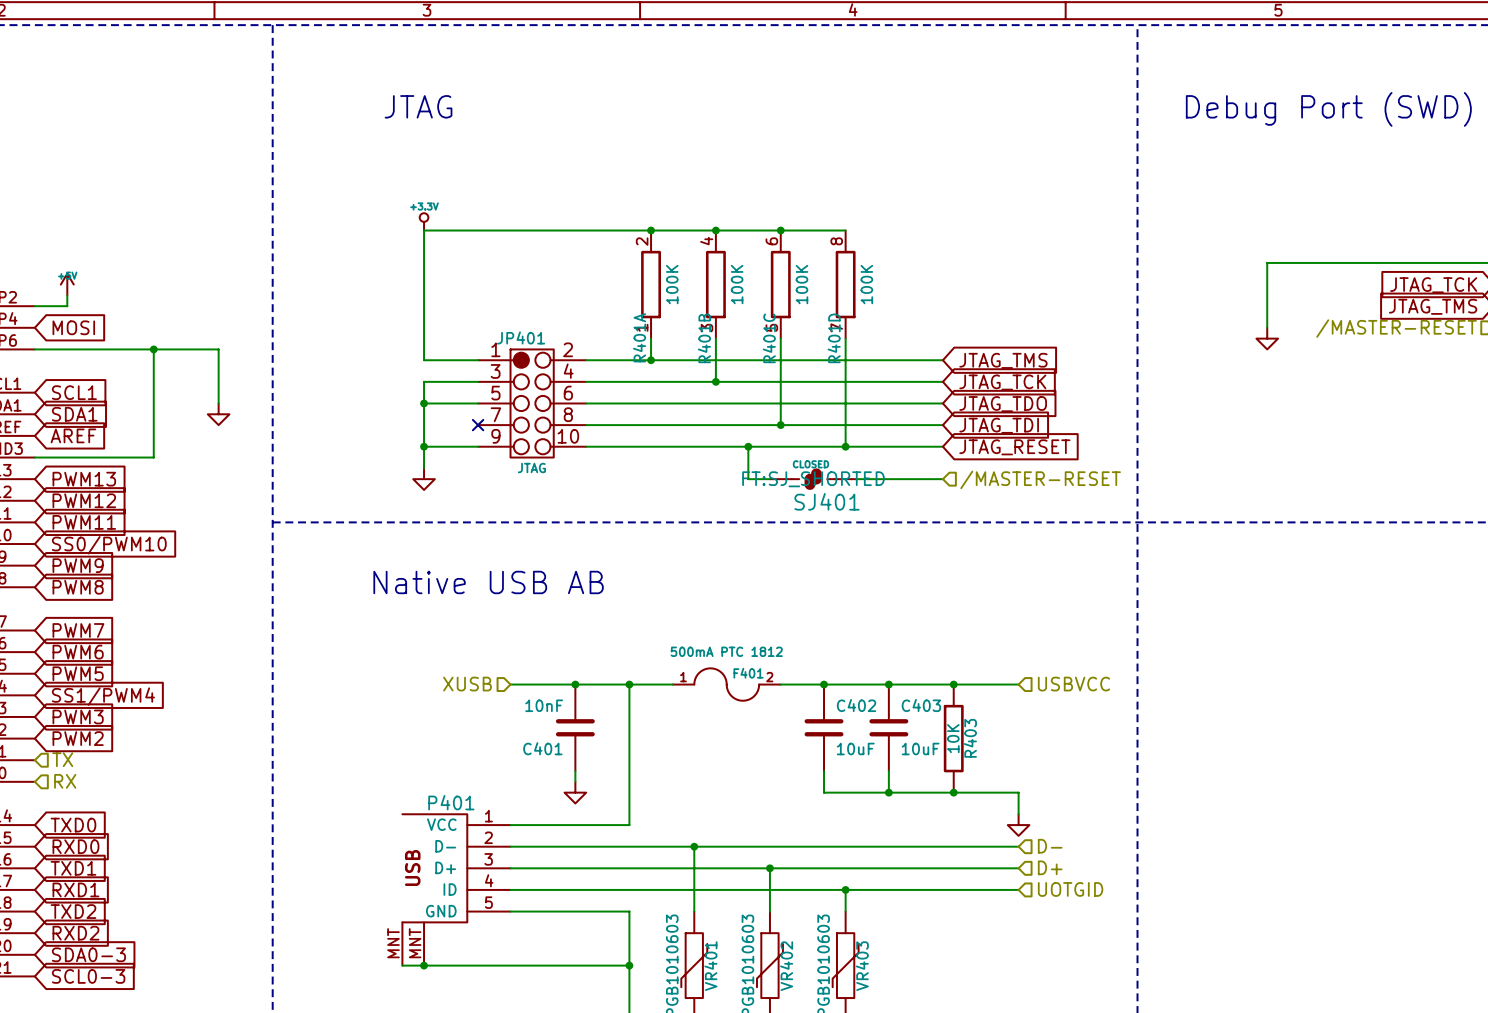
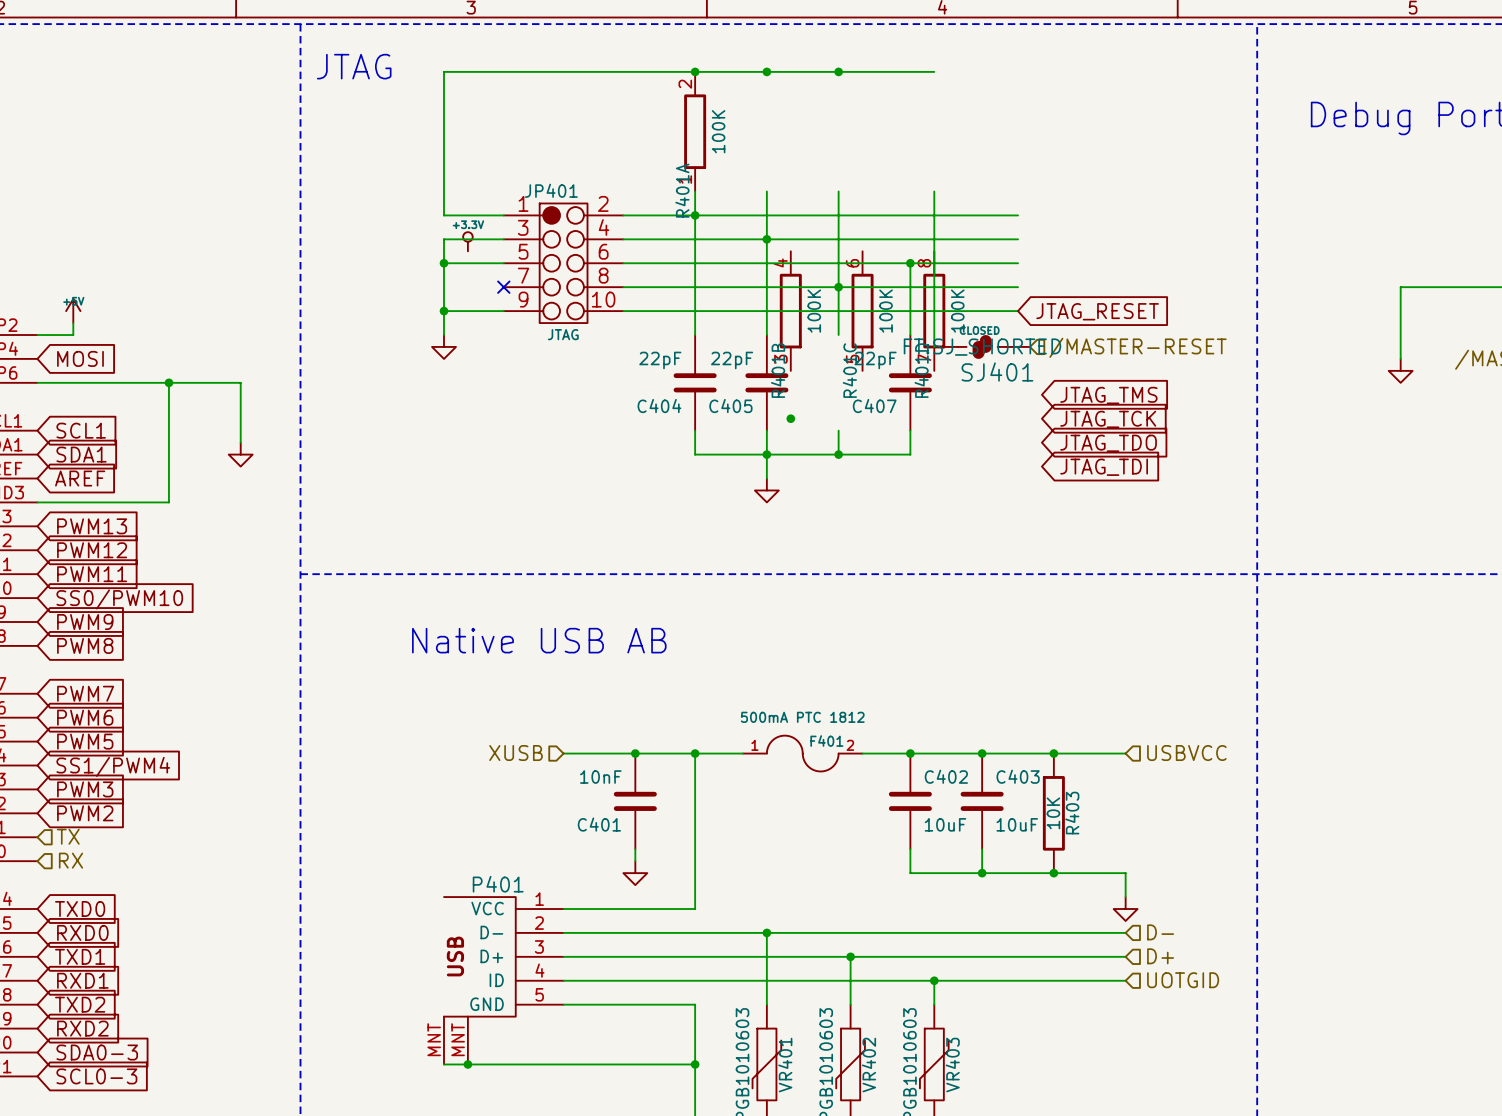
junction: none -> (695, 71)
junction: none -> (766, 71)
junction: none -> (838, 71)
wire: none -> (934, 71) (444, 71) (444, 215) (503, 215)
text position: JTAG (418, 106) -> JTAG (354, 66)
wire: none -> (695, 191) (695, 335)
wire: none -> (766, 191) (766, 335)
wire: none -> (838, 191) (838, 335)
wire: none -> (934, 191) (934, 346)
junction: none -> (695, 215)
junction: none -> (766, 239)
junction: (651, 230) -> none
junction: (715, 230) -> none
junction: (780, 230) -> none
wire: (845, 230) (424, 230) (424, 360) (478, 360) -> none
junction: none -> (444, 263)
wire: none -> (910, 263) (910, 335)
junction: none -> (910, 263)
no-connect mark: none -> (503, 287)
junction: none -> (838, 287)
junction: none -> (444, 311)
R401A position: (651, 284) -> (695, 131)
power symbol: none -> (444, 346)
wire: (651, 338) (651, 360) -> (838, 430) (838, 454)
wire: (715, 338) (715, 381) -> (766, 430) (766, 478)
wire: (780, 338) (780, 425) -> none
wire: (845, 338) (845, 446) -> none
C404: none -> 22pF (695, 382)
C405: none -> 22pF (766, 382)
C407: none -> 22pF (910, 382)
wire: (586, 360) (942, 360) -> (623, 215) (1018, 215)
junction: (651, 360) -> none
wire: (478, 381) (424, 381) (424, 468) -> (503, 239) (444, 239) (444, 335)
wire: (586, 381) (942, 381) -> (623, 239) (1018, 239)
wire: none -> (695, 430) (695, 454) (910, 454) (910, 430)
wire: (424, 403) (478, 403) -> (444, 263) (503, 263)
junction: (424, 403) -> none
JP401 position: (532, 403) -> (563, 263)
wire: (586, 403) (942, 403) -> (623, 263) (1018, 263)
junction: none -> (766, 454)
junction: none -> (838, 454)
no-connect mark: (478, 425) -> none
wire: (586, 425) (942, 425) -> (623, 287) (1018, 287)
junction: (780, 425) -> none
wire: (424, 446) (478, 446) -> (444, 311) (503, 311)
junction: (424, 446) -> none
wire: (586, 446) (942, 446) -> (623, 311) (1018, 311)
power symbol: none -> (766, 490)
wire: (748, 446) (748, 479) (769, 479) -> none
junction: (748, 446) -> none
junction: (845, 446) -> none
global label position: JTAG_RESET (1014, 447) -> JTAG_RESET (1097, 311)
power symbol: (424, 479) -> none
SJ401 position: (813, 479) -> (982, 346)
wire: (856, 479) (942, 479) -> none
hierarchical label position: /MASTER-RESET (1040, 479) -> /MASTER-RESET (1138, 347)

